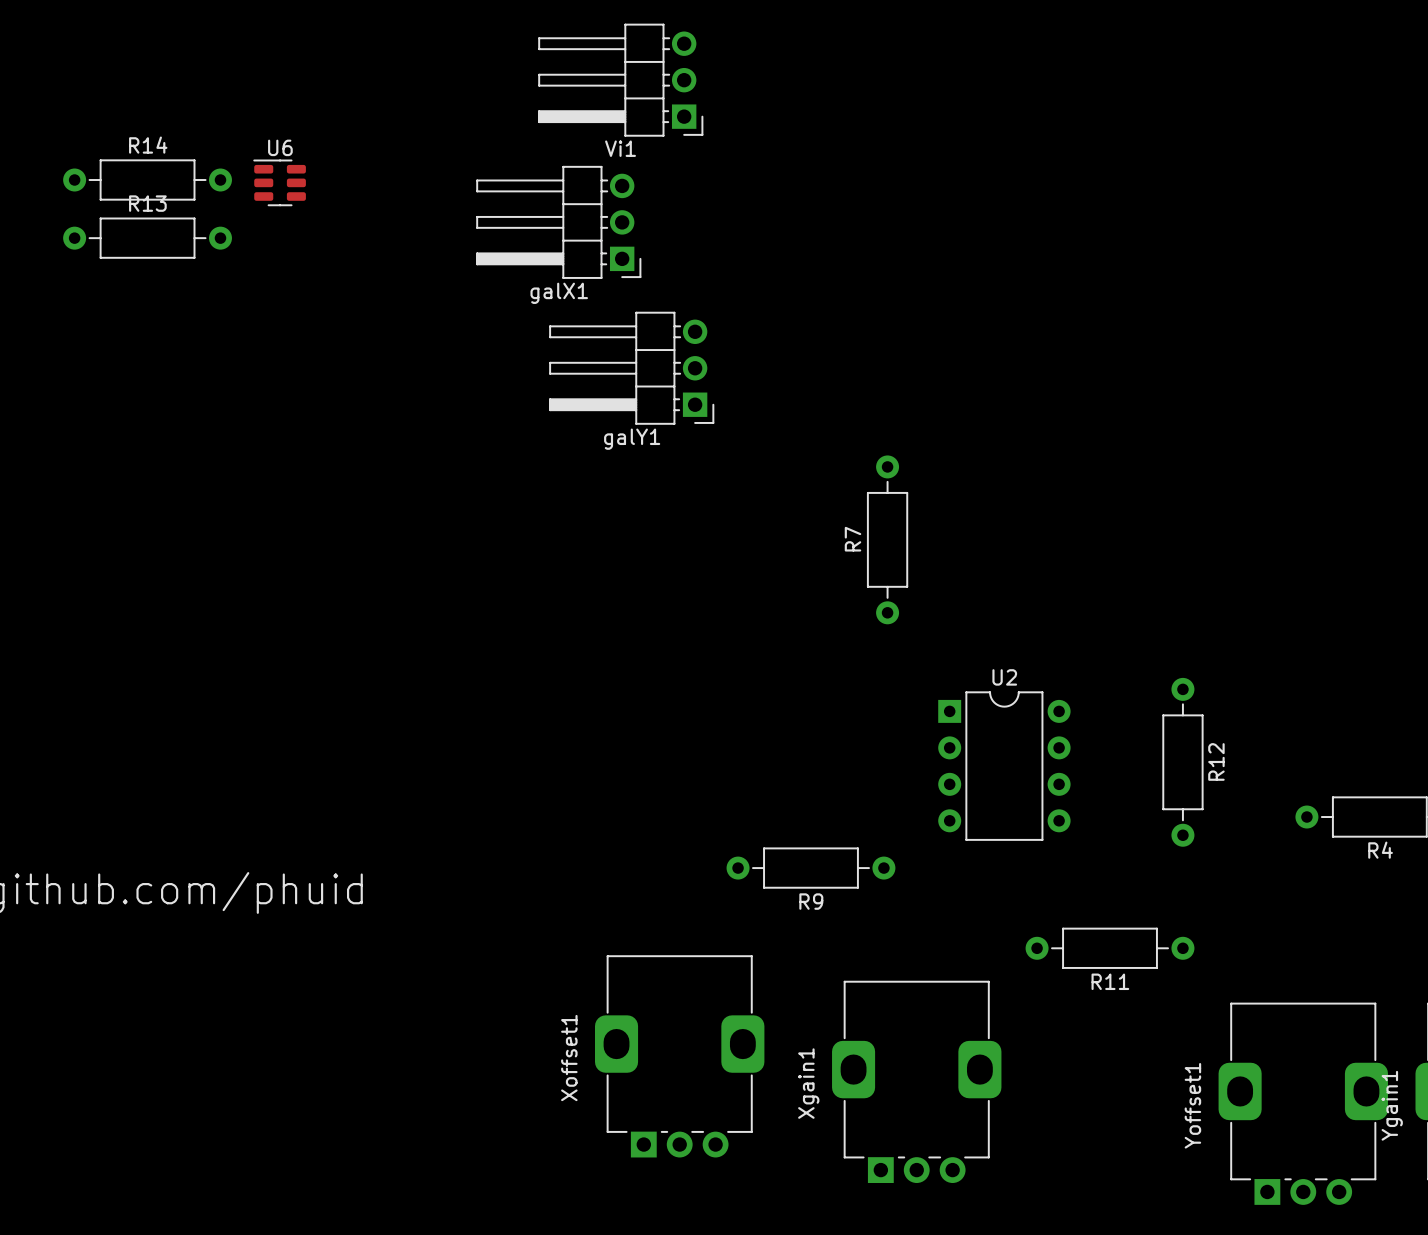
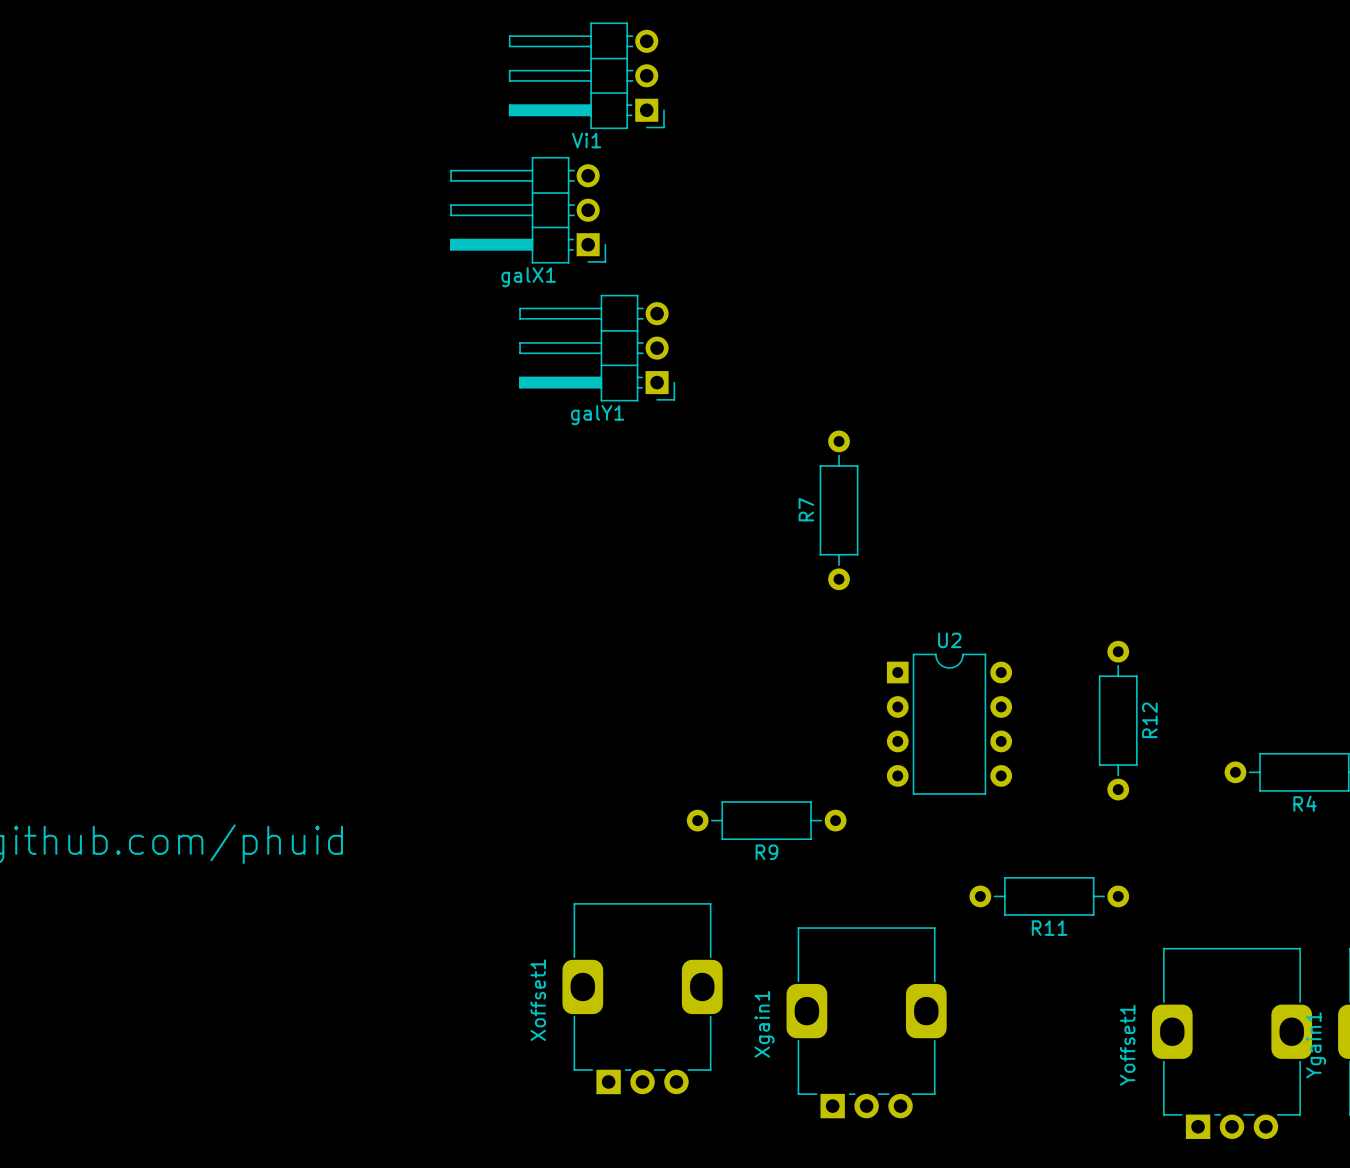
R14: (147, 180) -> none
U6: (279, 182) -> none
R13: (147, 238) -> none

